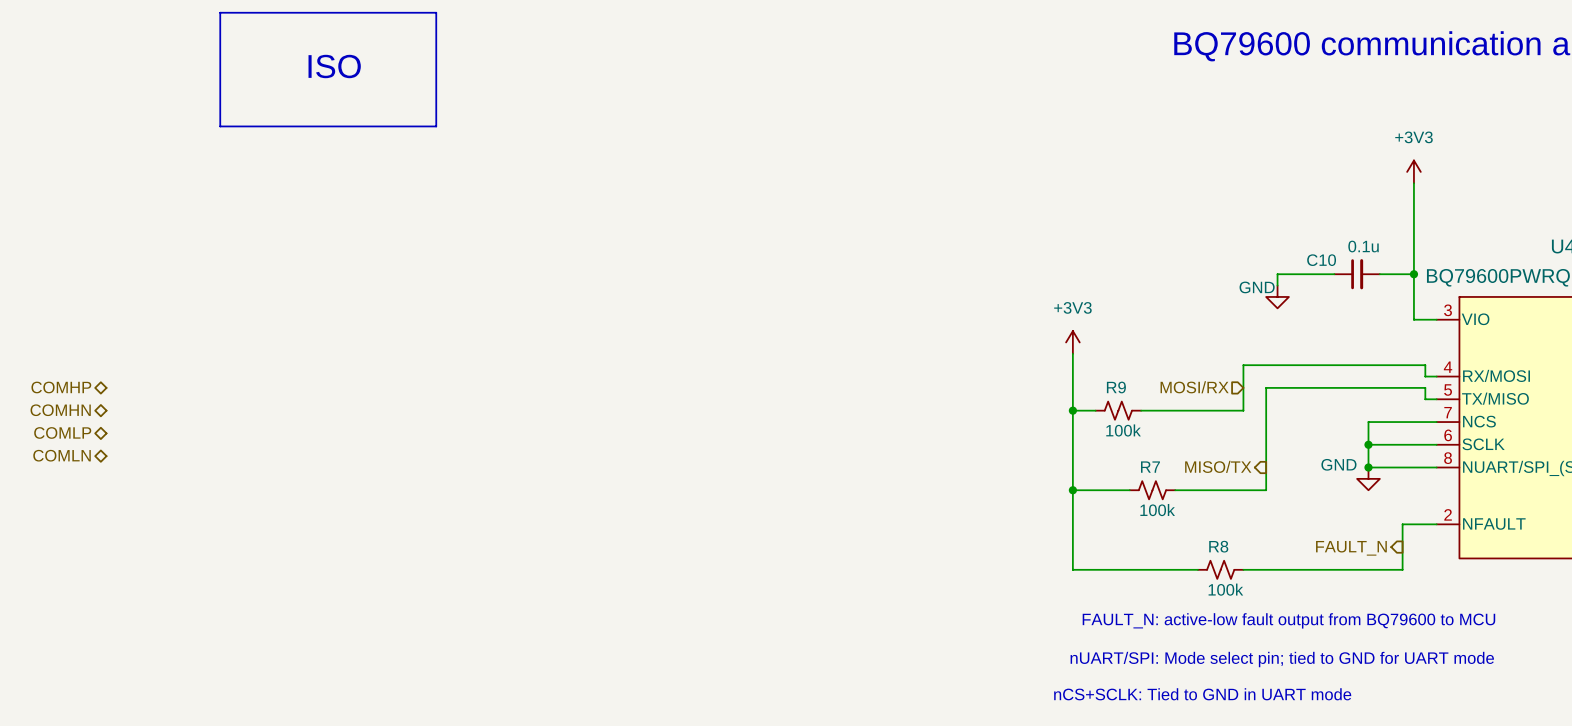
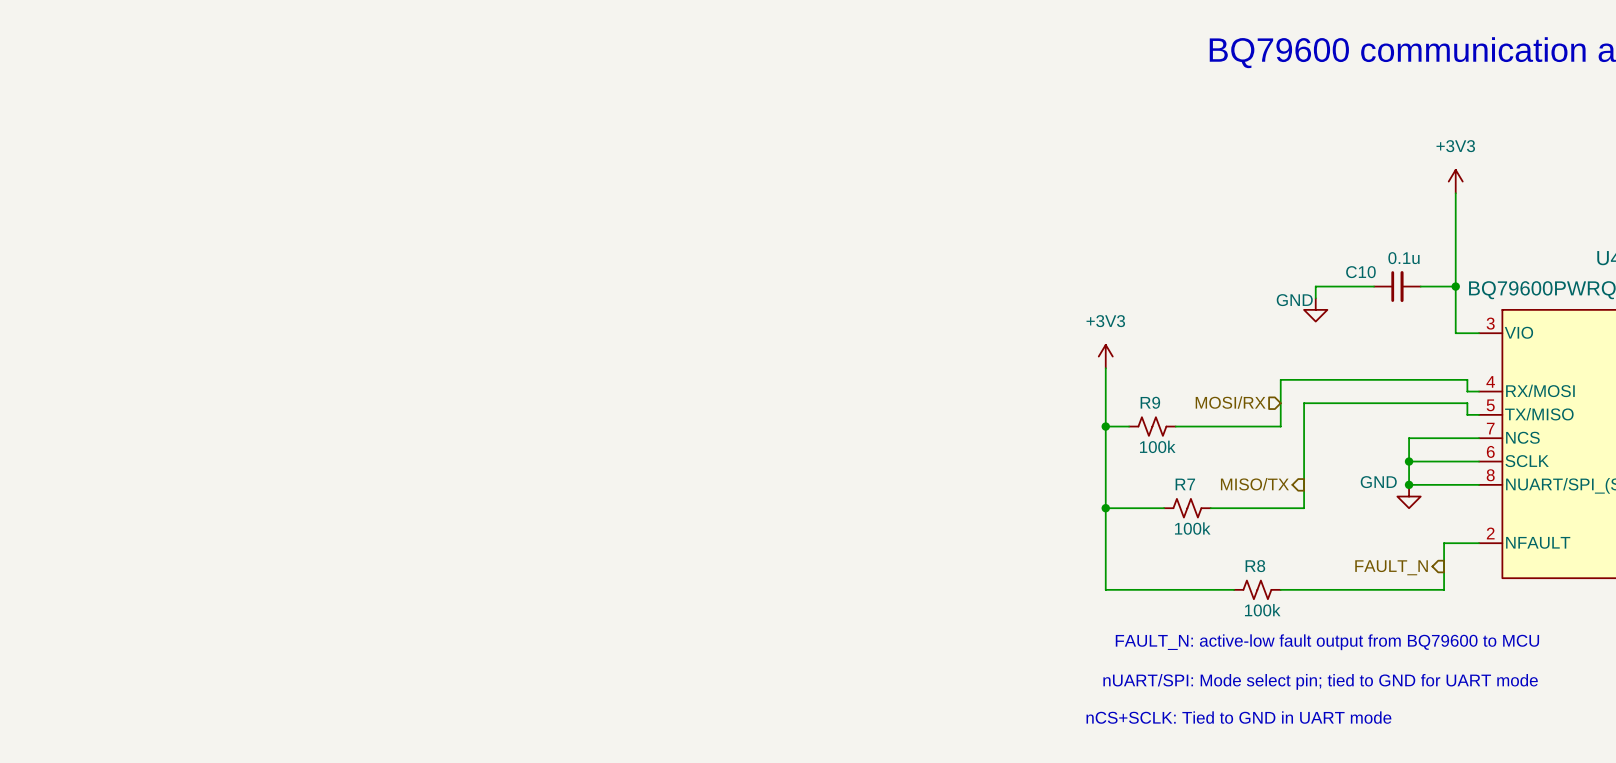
line: (220, 12) (436, 12) (436, 126) (220, 126) (220, 12) -> none
text: ISO (334, 66) -> none
hierarchical label: COMHP (61, 387) -> none
hierarchical label: COMHN (60, 410) -> none
hierarchical label: COMLP (62, 432) -> none
hierarchical label: COMLN (62, 455) -> none

